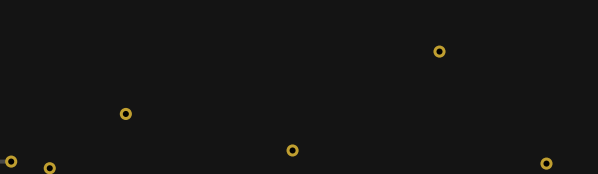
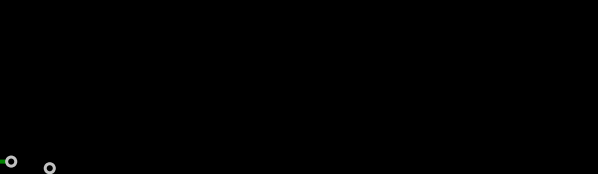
via: (439, 51) -> none
via: (125, 113) -> none
via: (292, 150) -> none
via: (546, 163) -> none

